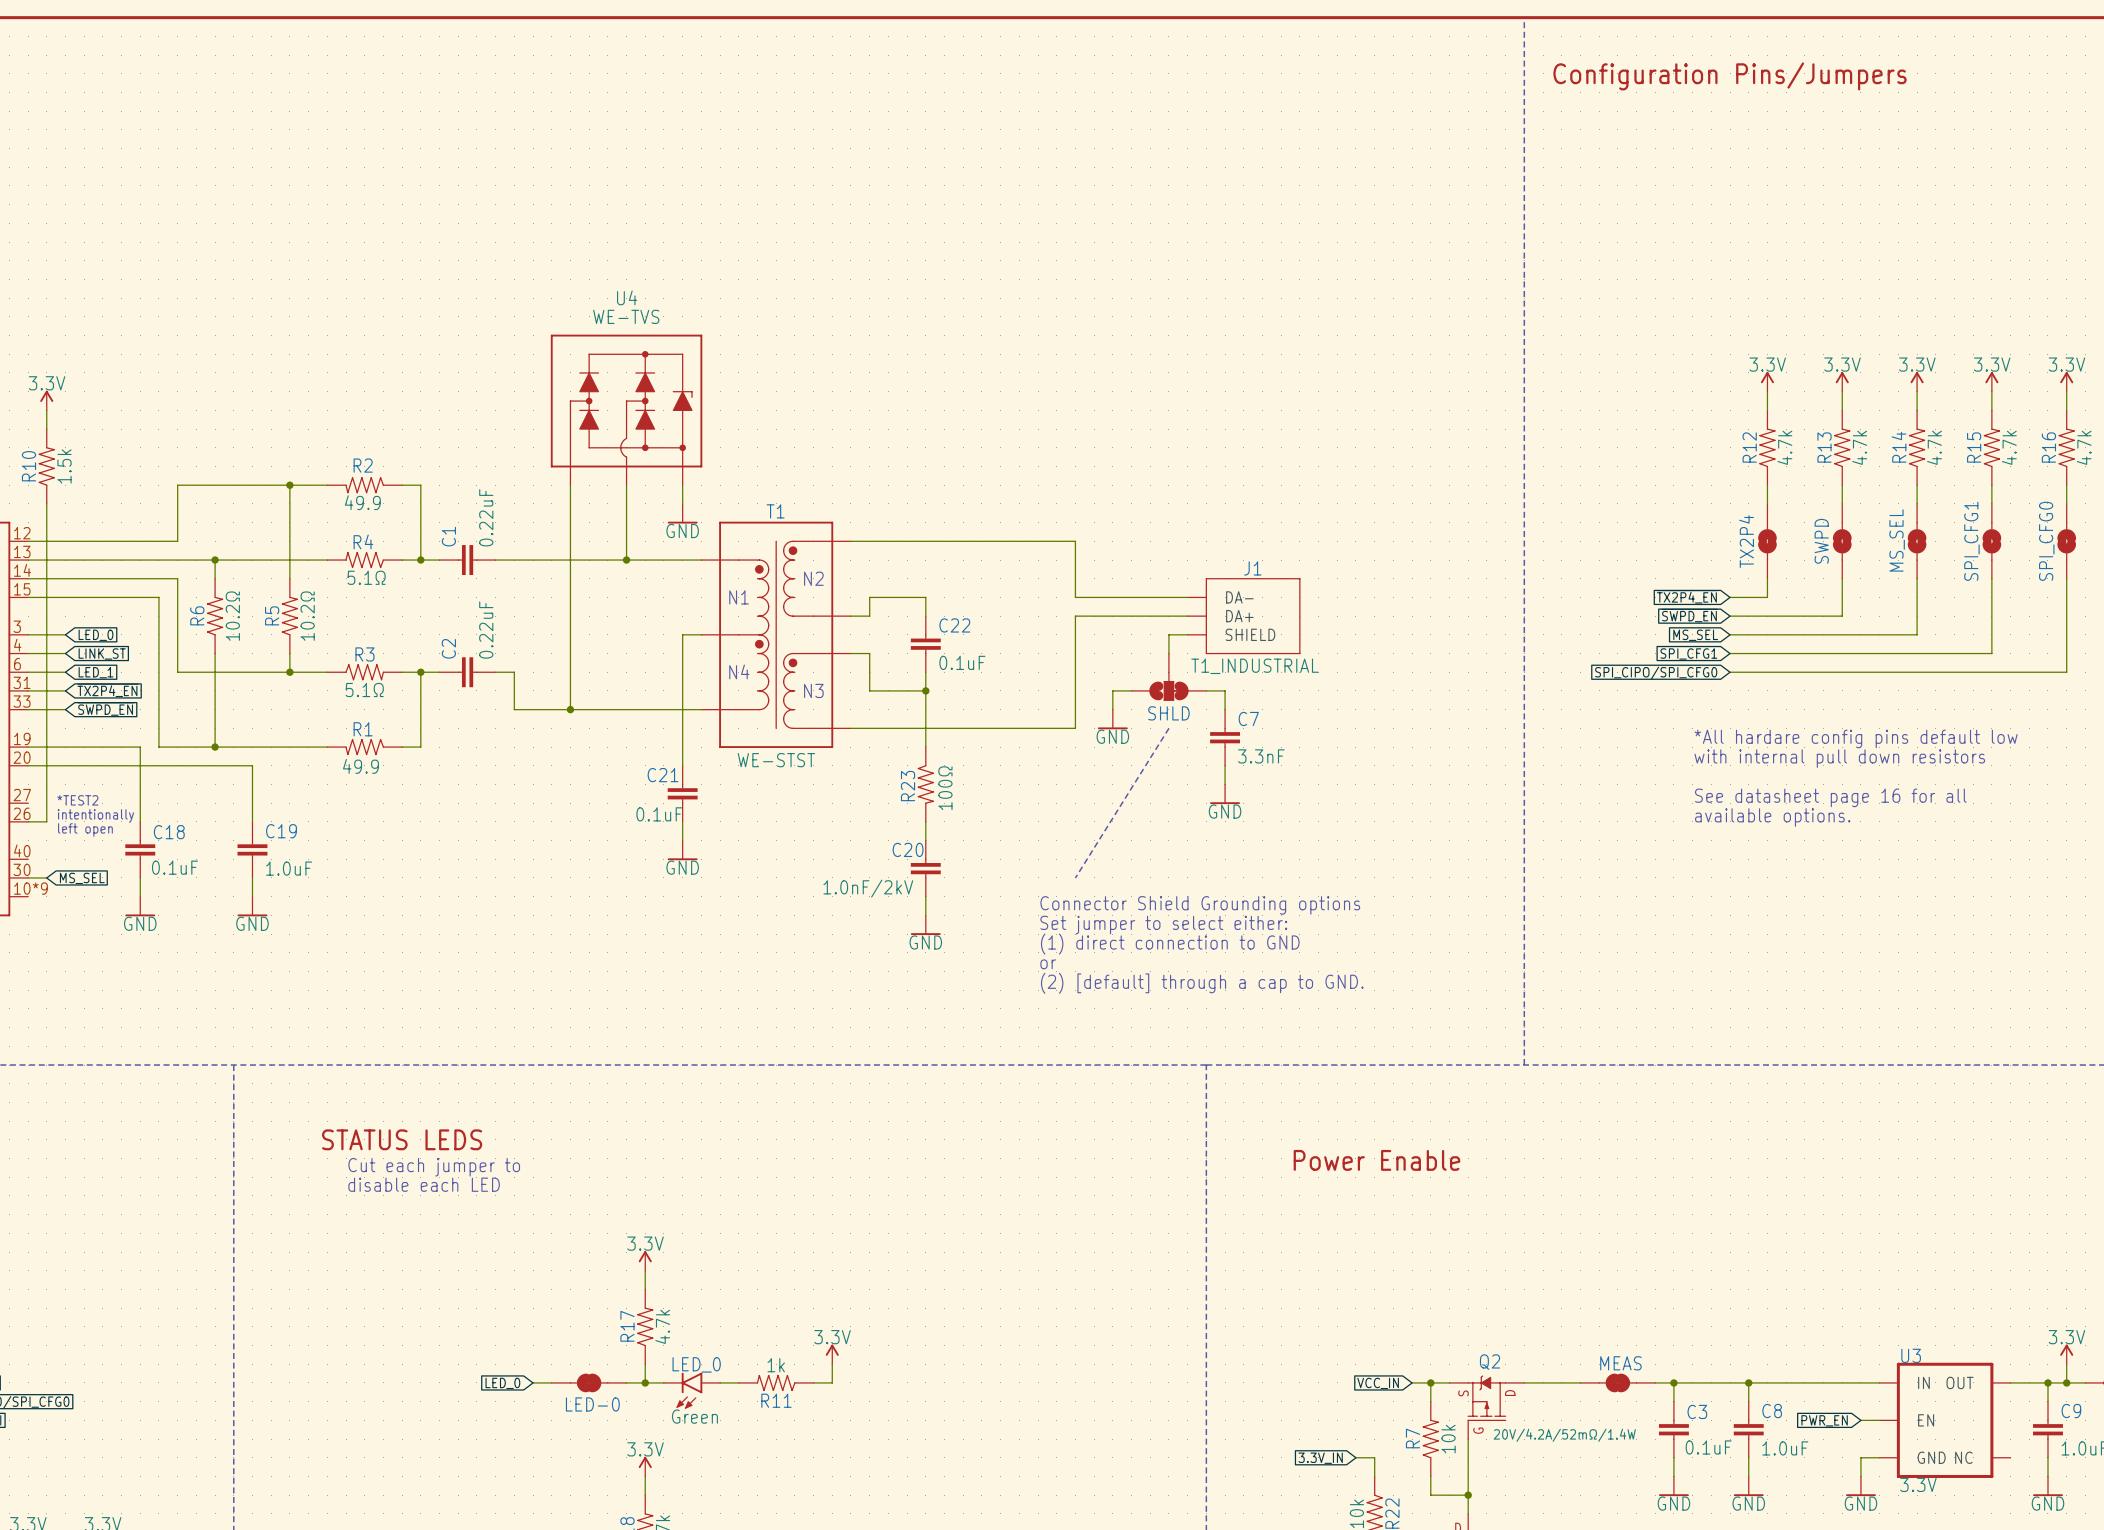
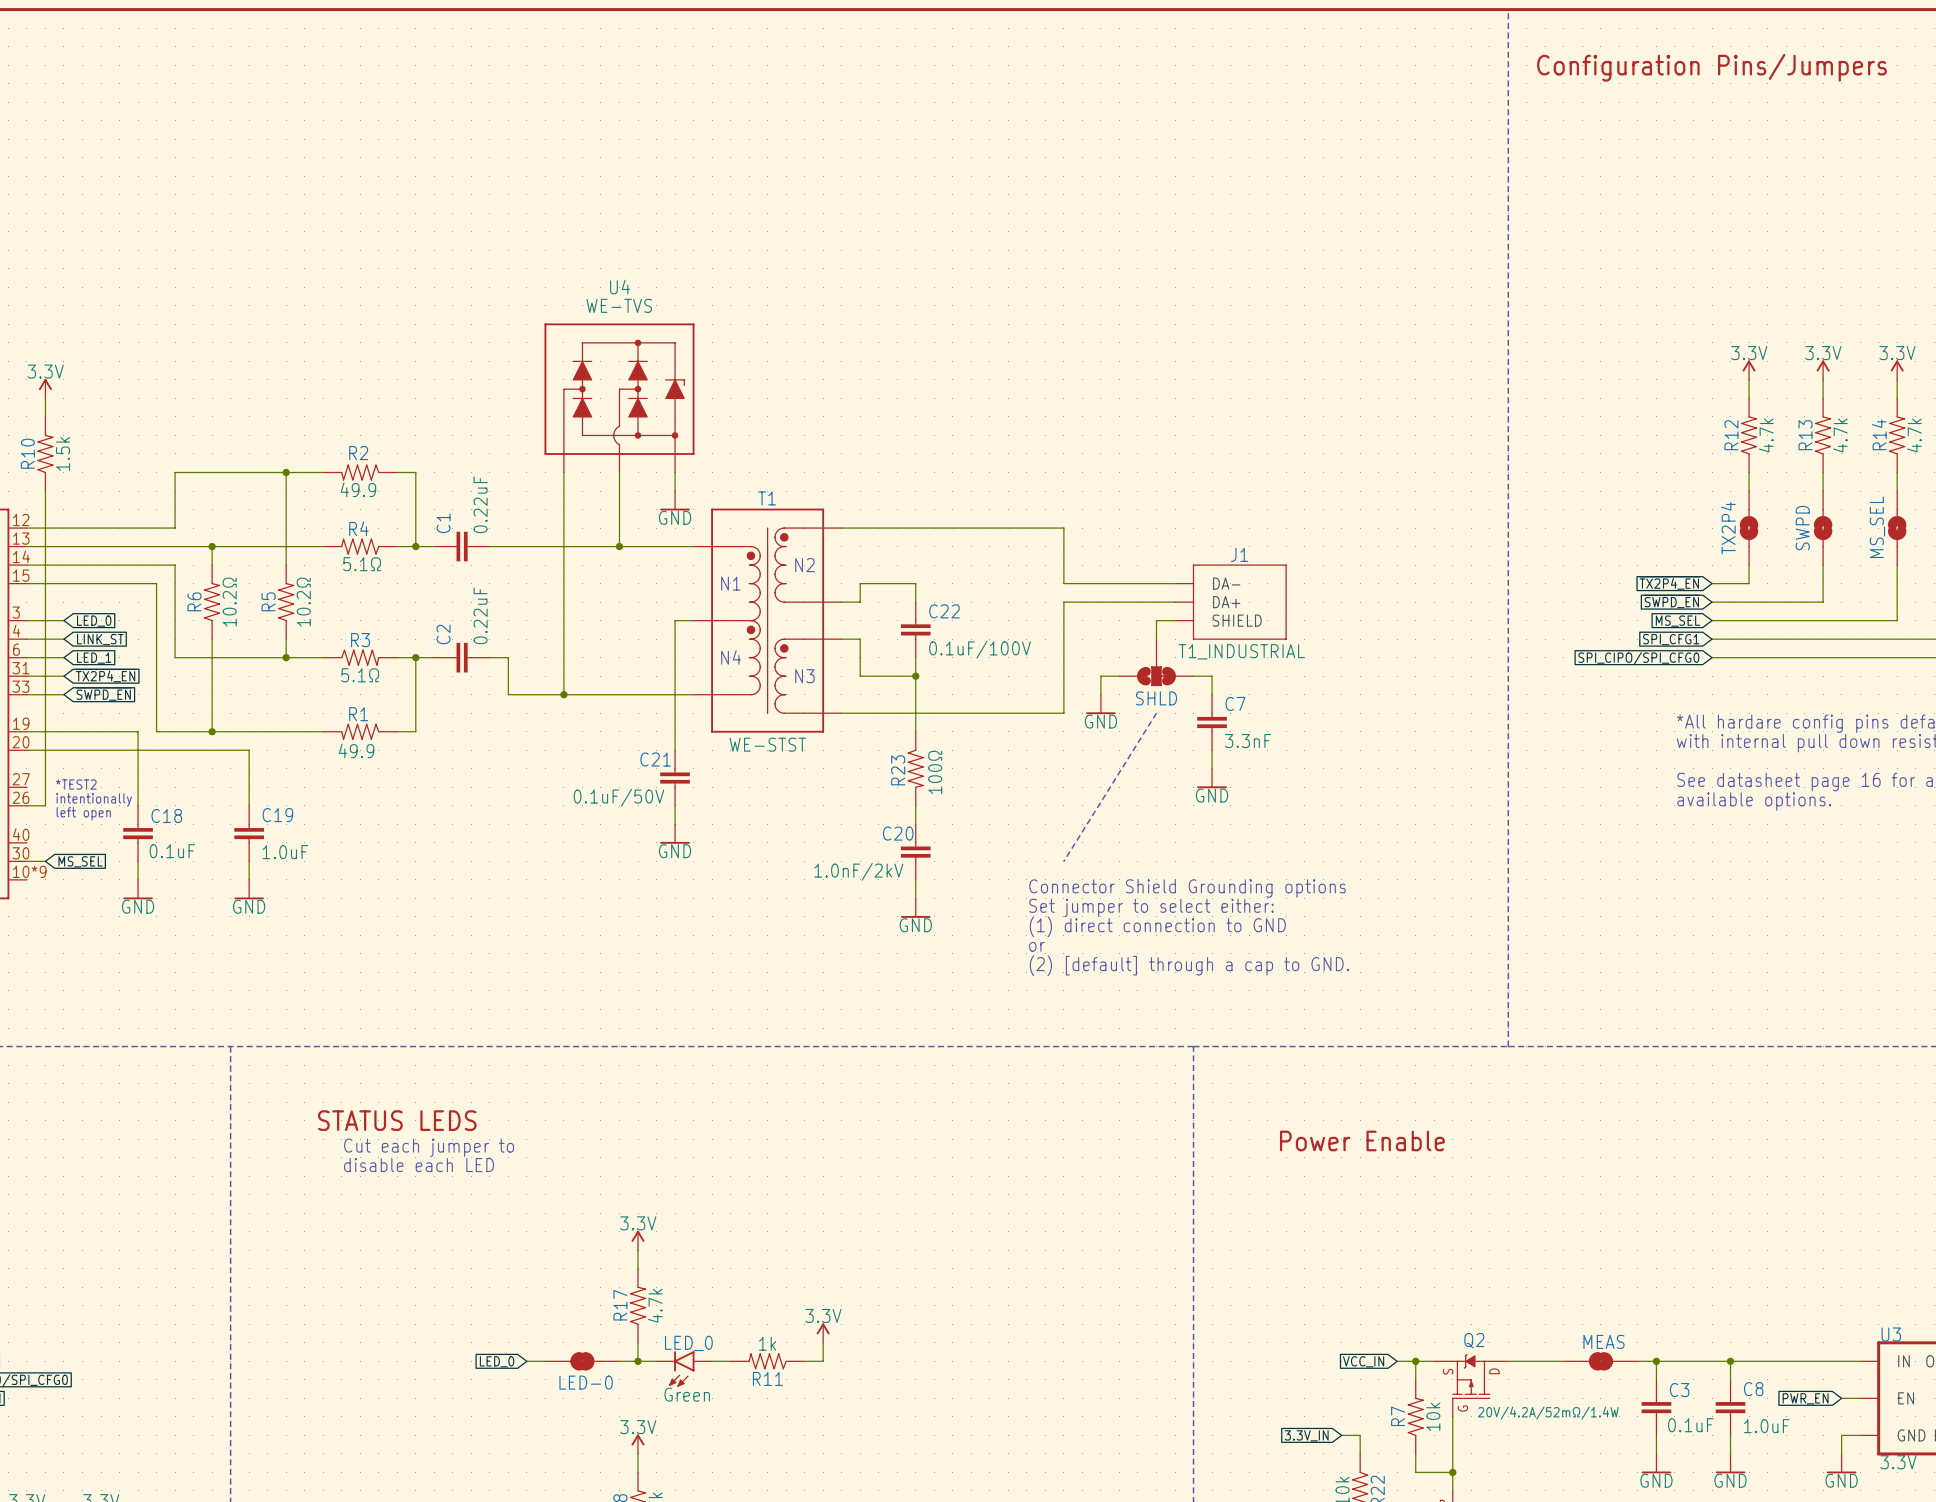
C22 value: 0.1uF (962, 662) -> 0.1uF/100V (980, 649)
C21 value: 0.1uF (659, 814) -> 0.1uF/50V (618, 797)

